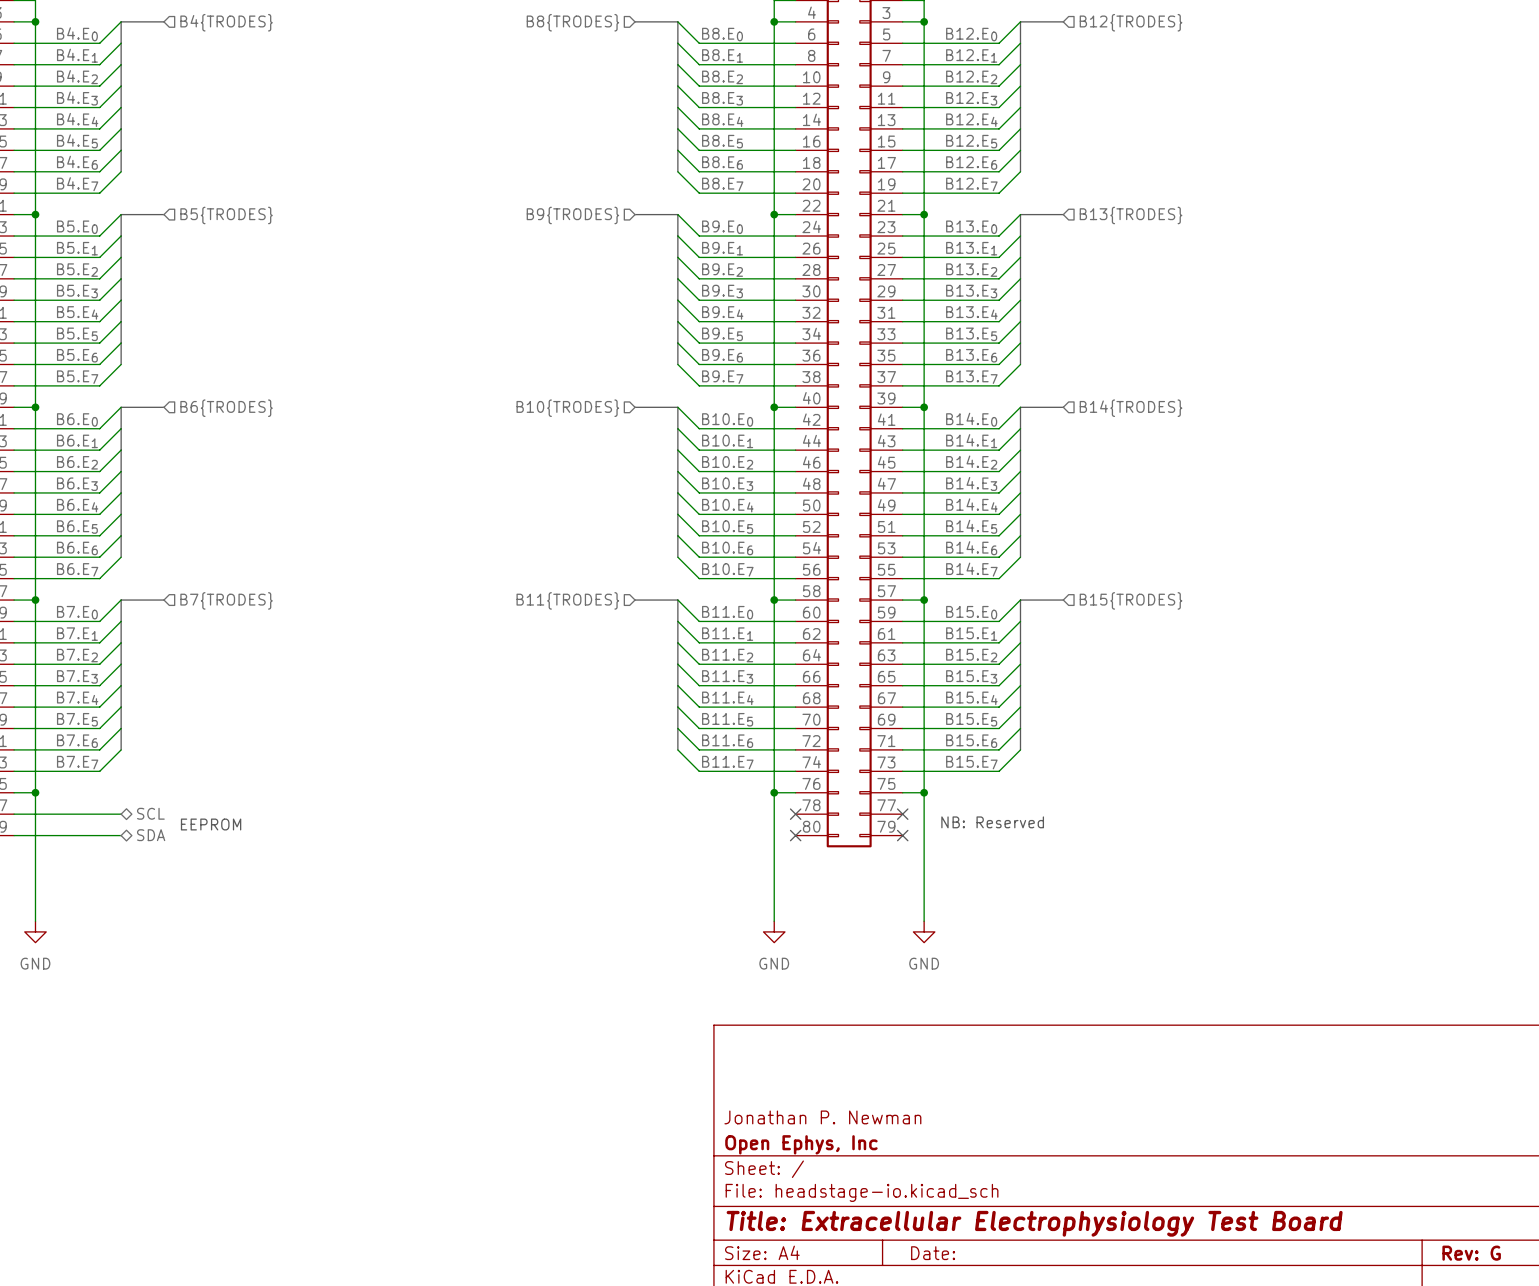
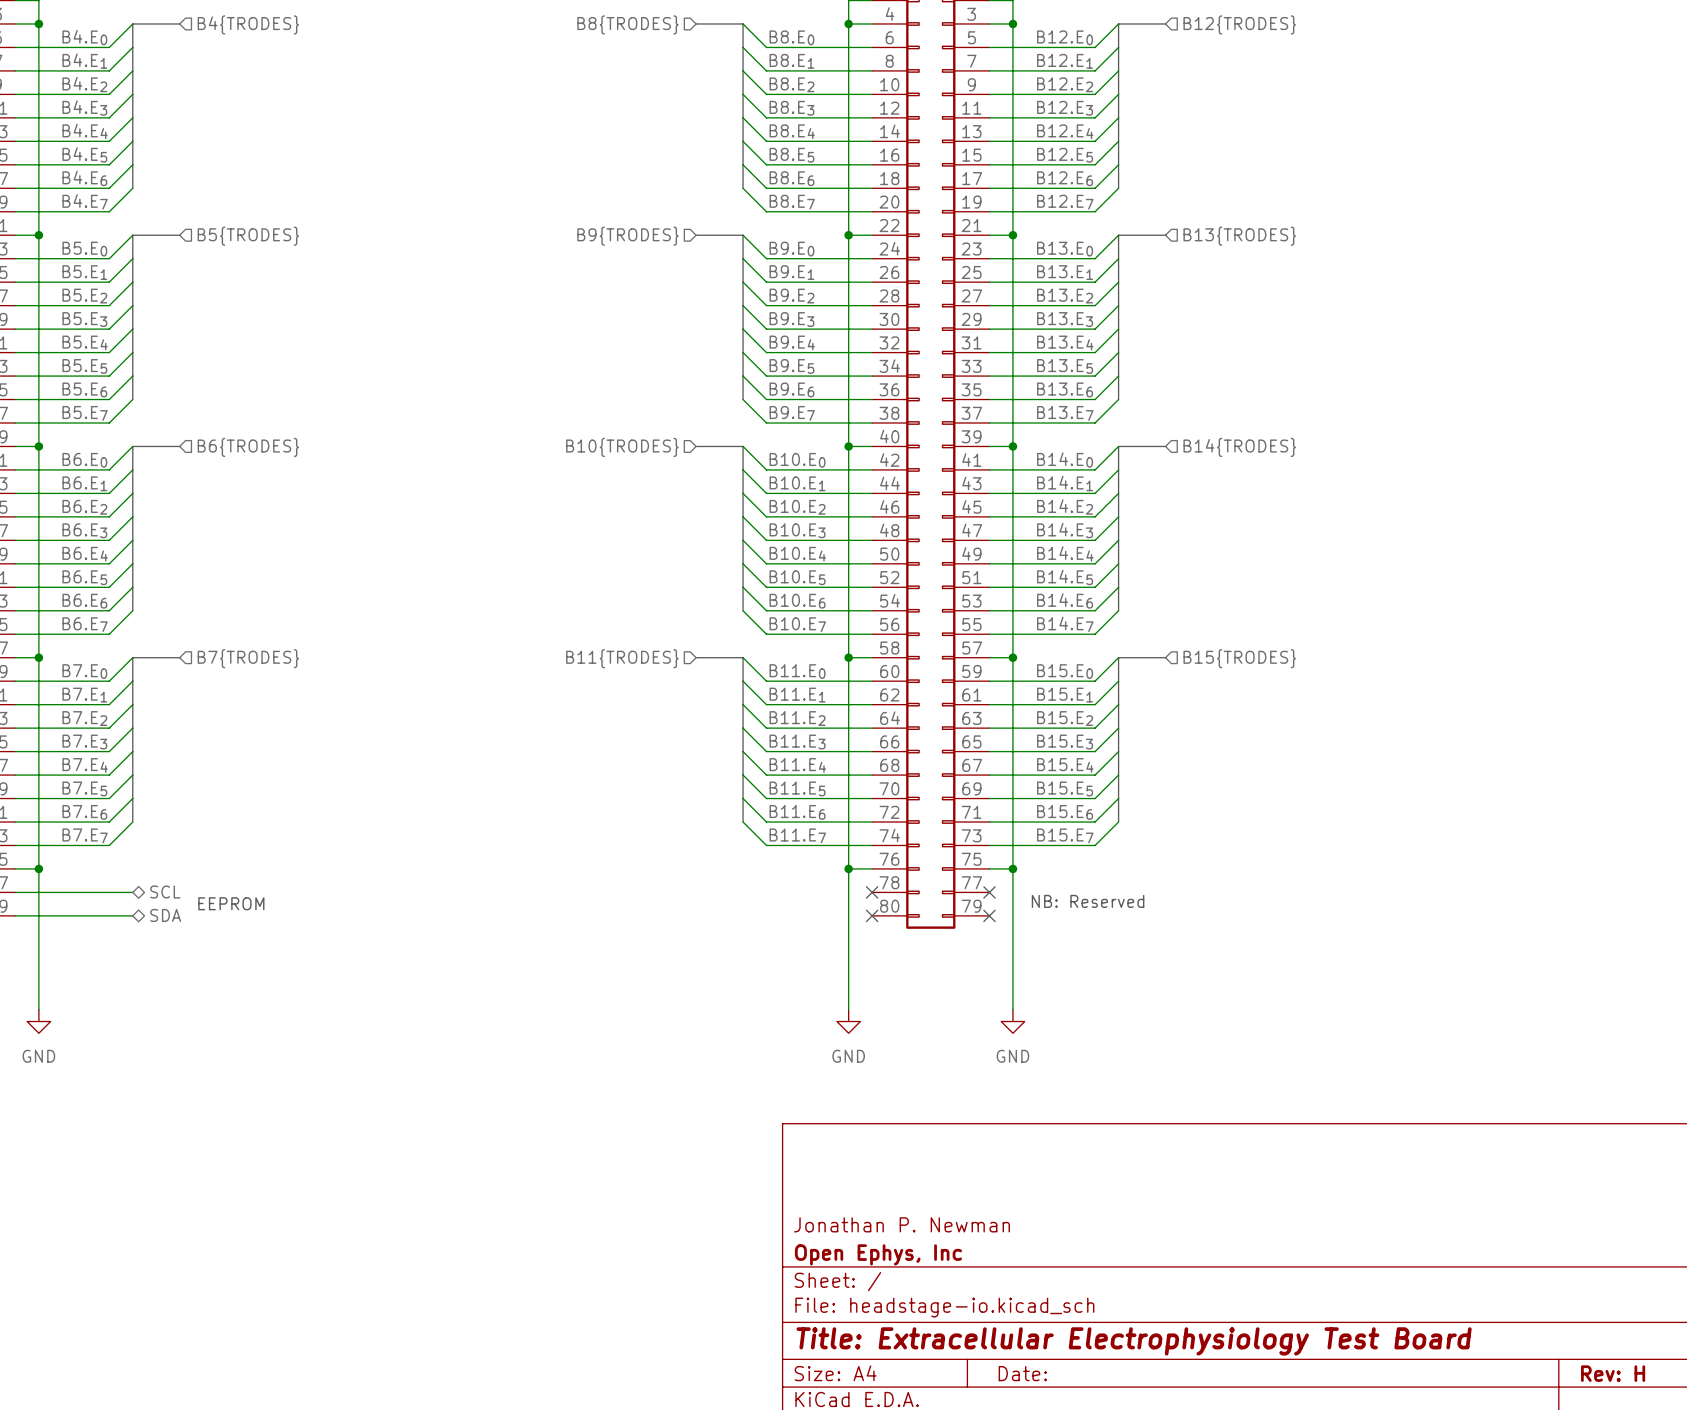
title block: Rev: G (1471, 1253) -> Rev: H (1613, 1373)

